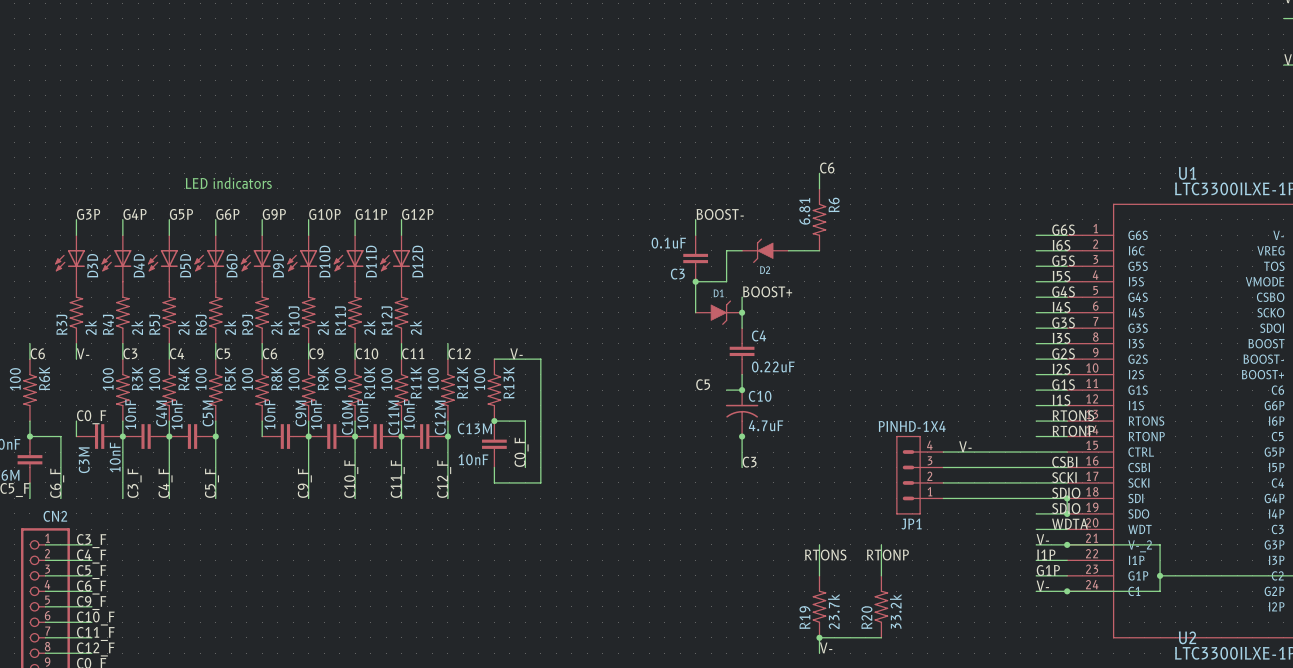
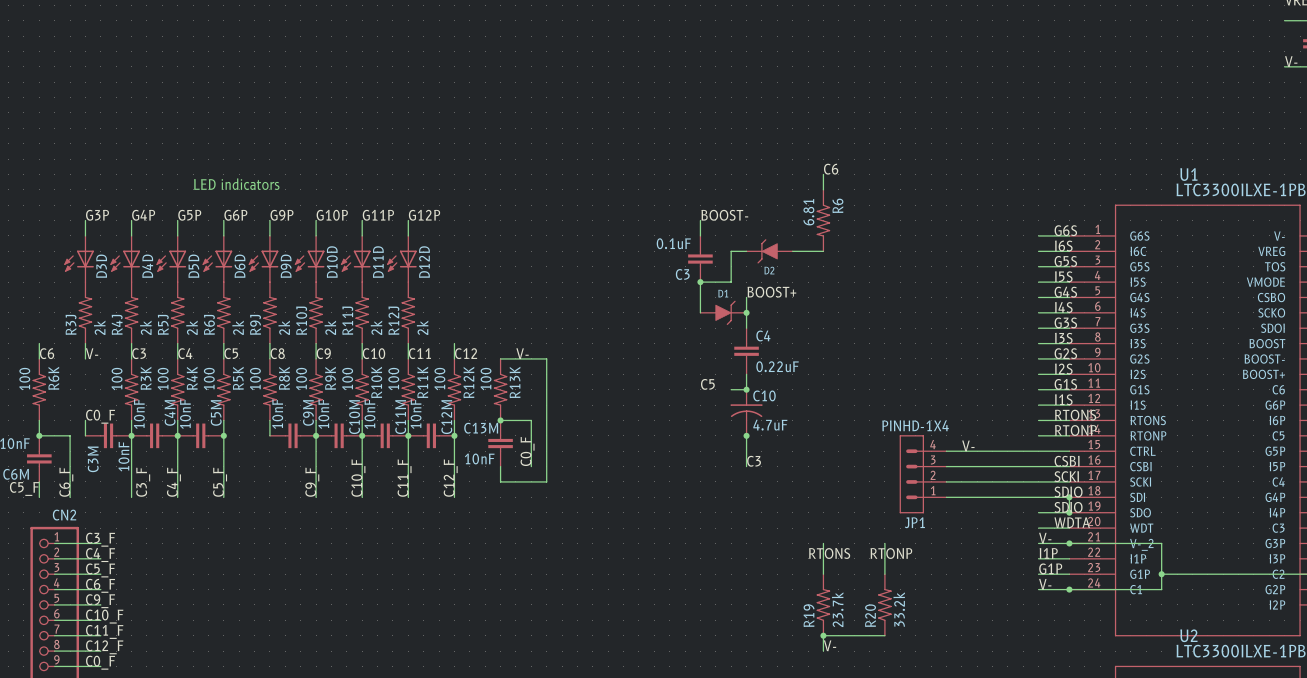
label: C6 (269, 353) -> C8 (277, 353)

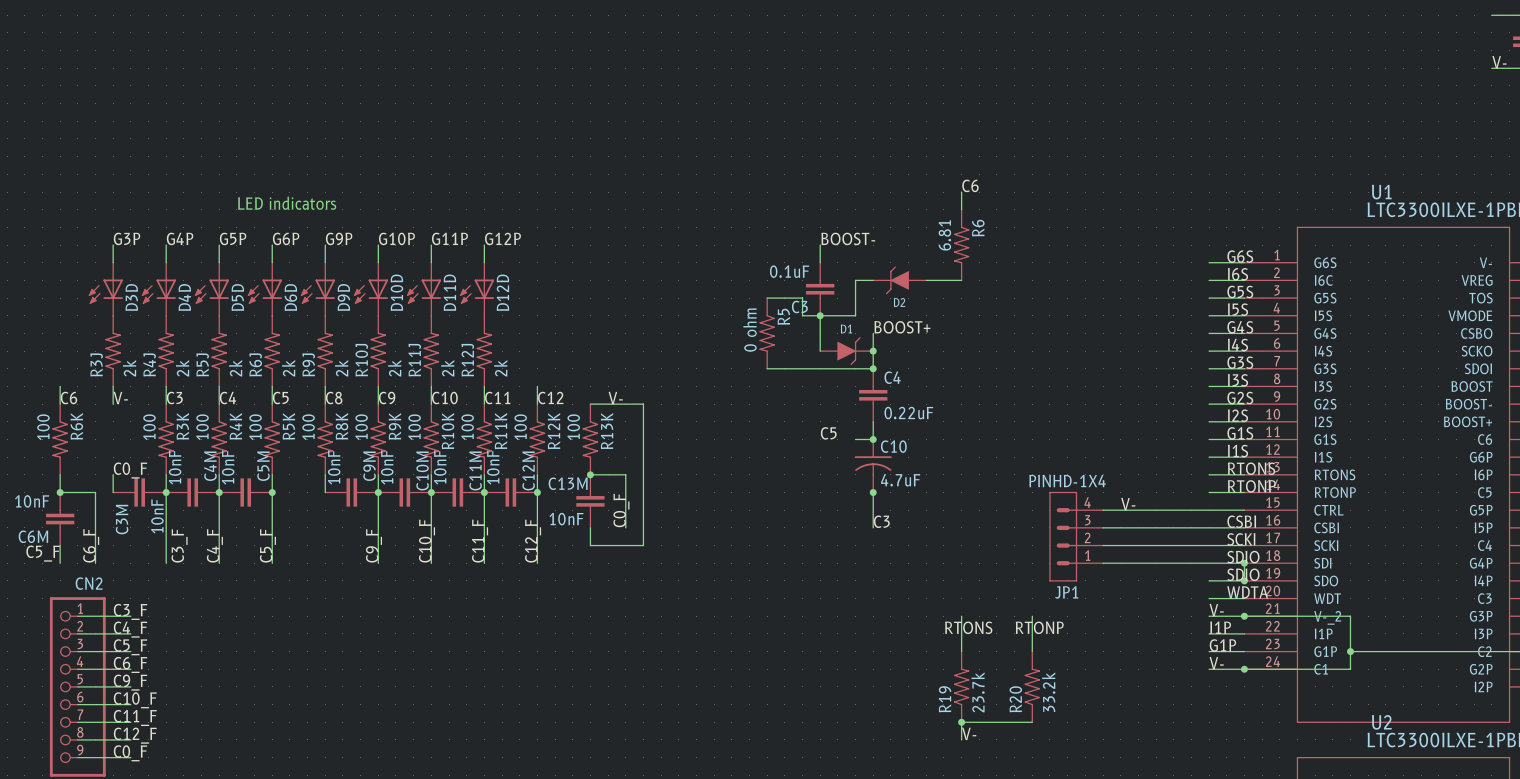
wire: none -> (767, 298) (802, 298) (802, 315) (820, 315)
R5: none -> 0 ohm (767, 333)
wire: none -> (767, 368) (873, 368)
junction: none -> (873, 368)

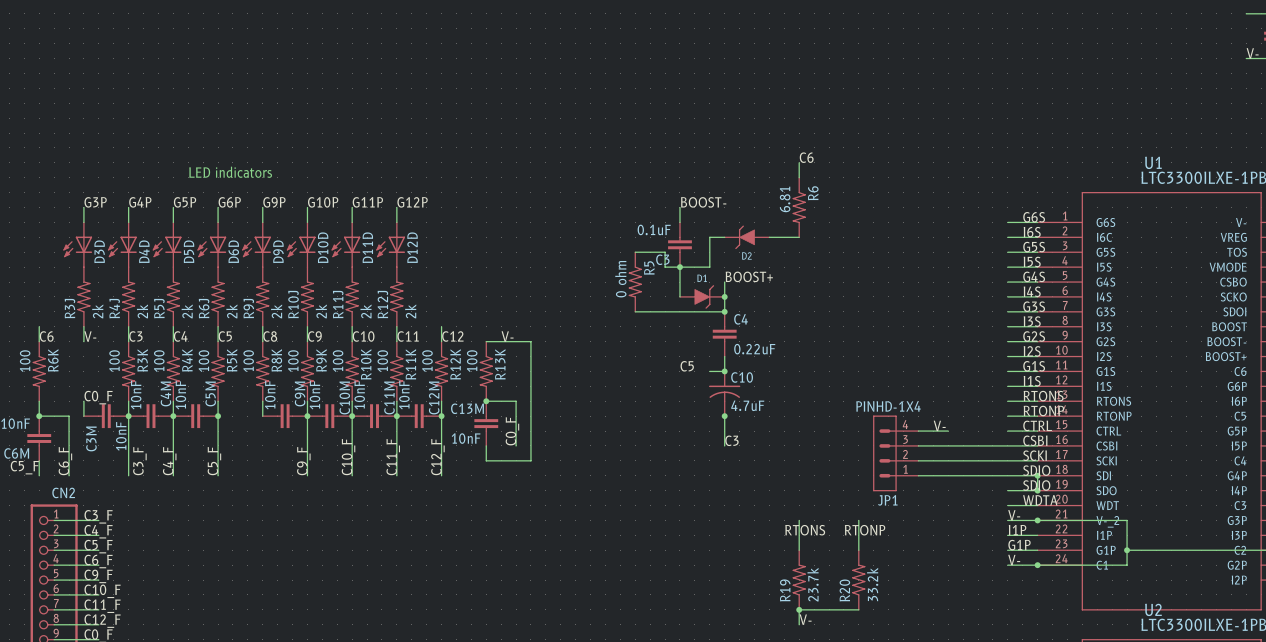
label: none -> CTRL (1037, 425)
wire: (1138, 510) (1209, 510) -> none

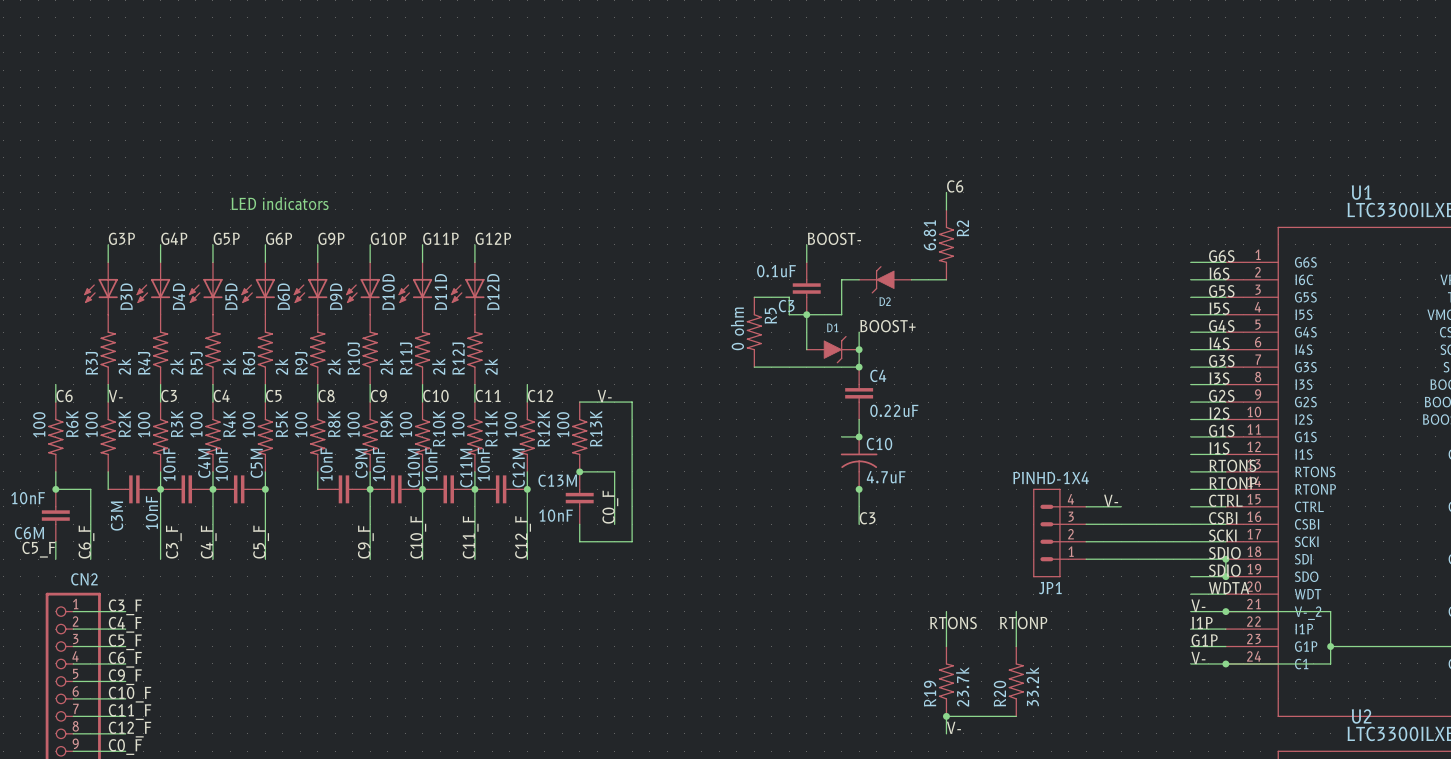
R6 name: R6 (813, 193) -> R2 (962, 228)
label: C5 (687, 366) -> none
R2K: none -> 100 (108, 436)
label: C0_F (98, 397) -> none

